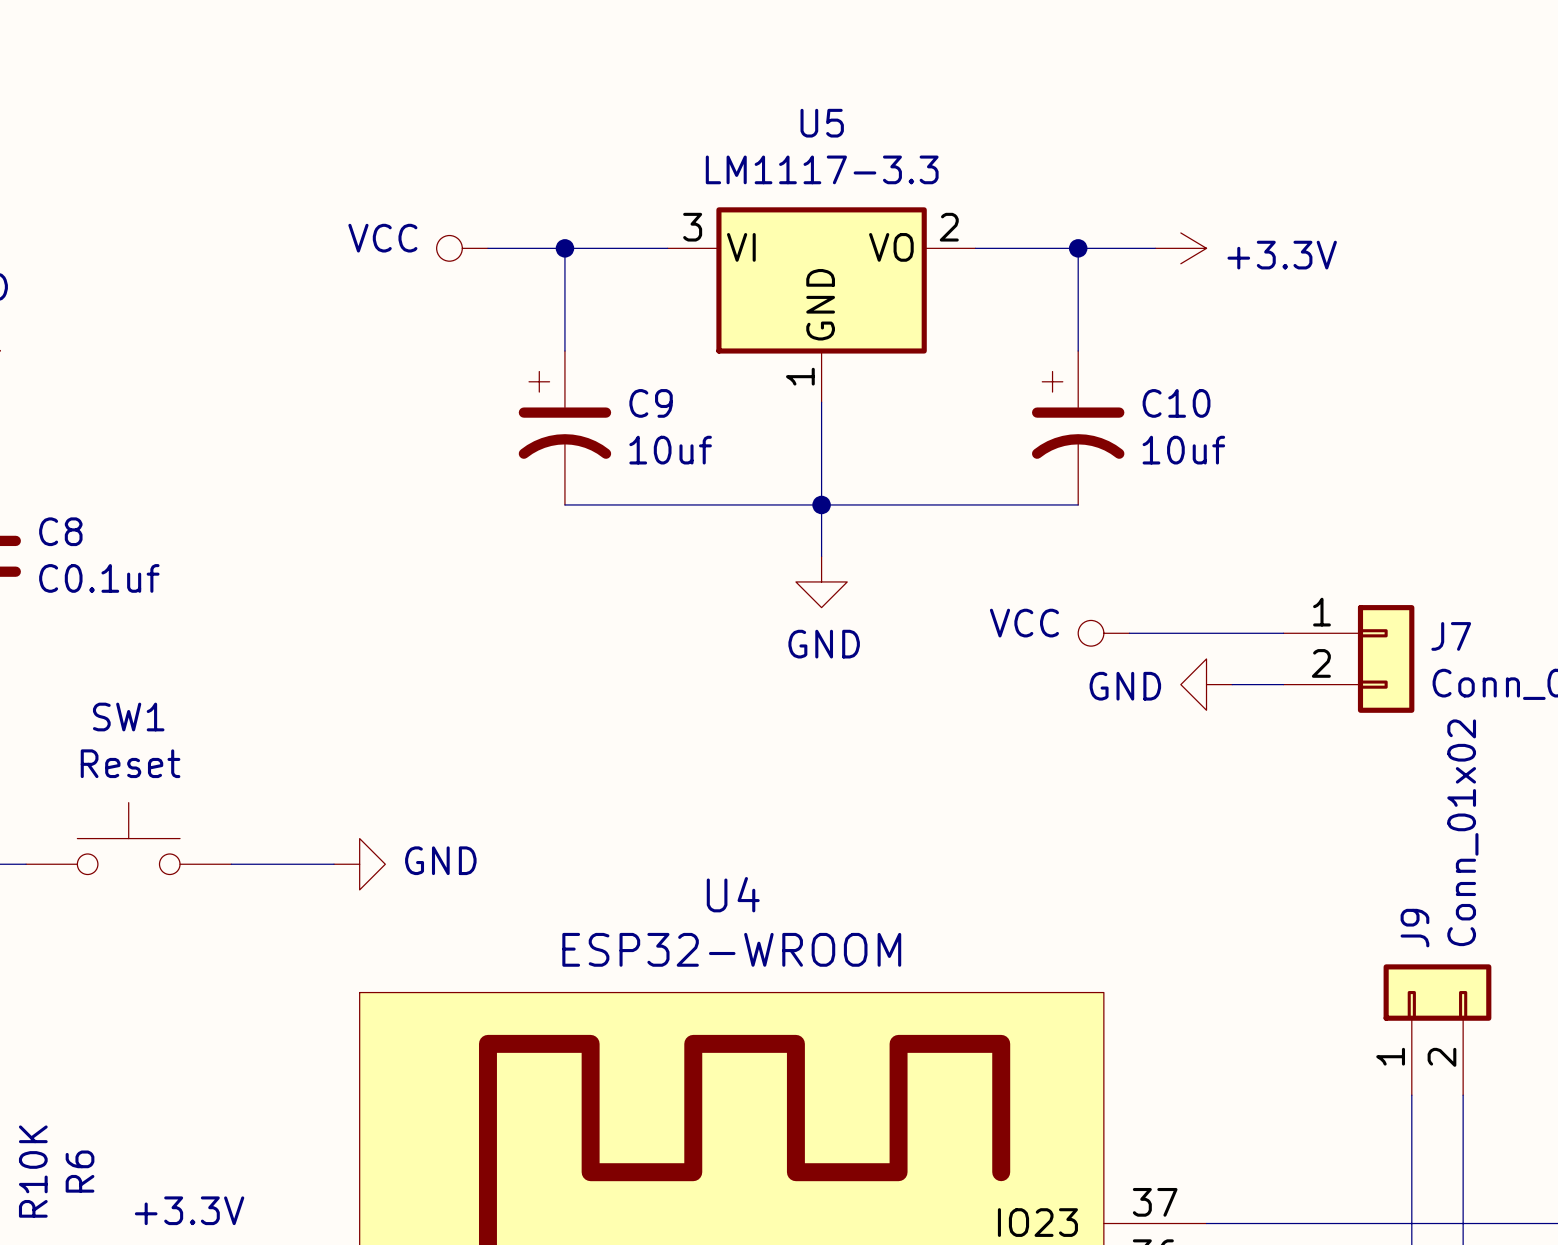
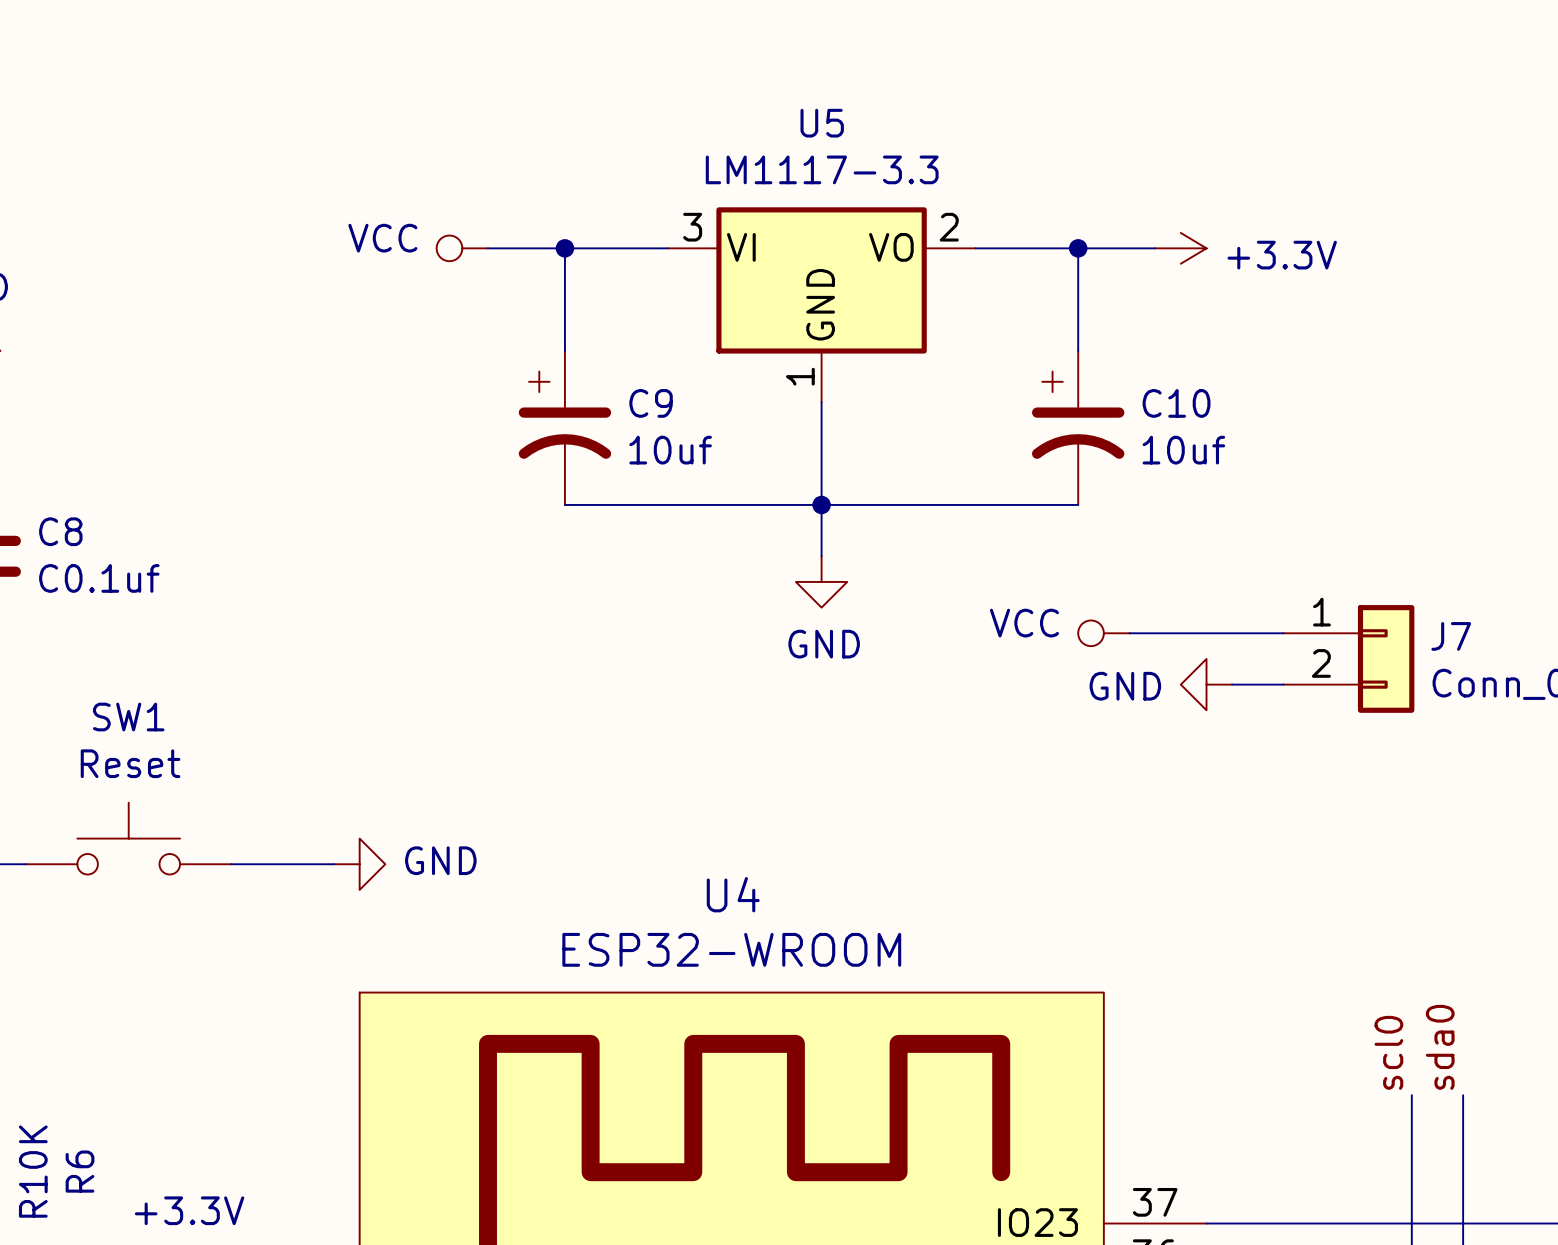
J9: Conn_01x02 (1437, 1029) -> none
label: none -> sda0 (1440, 1047)
label: none -> scl0 (1388, 1052)

